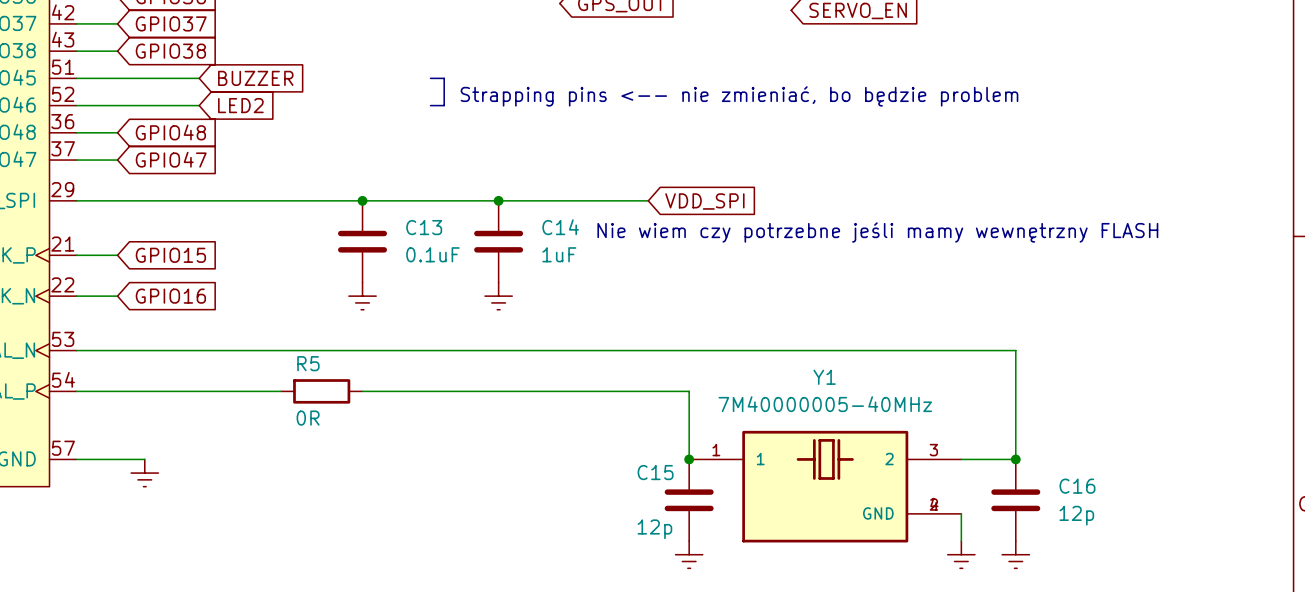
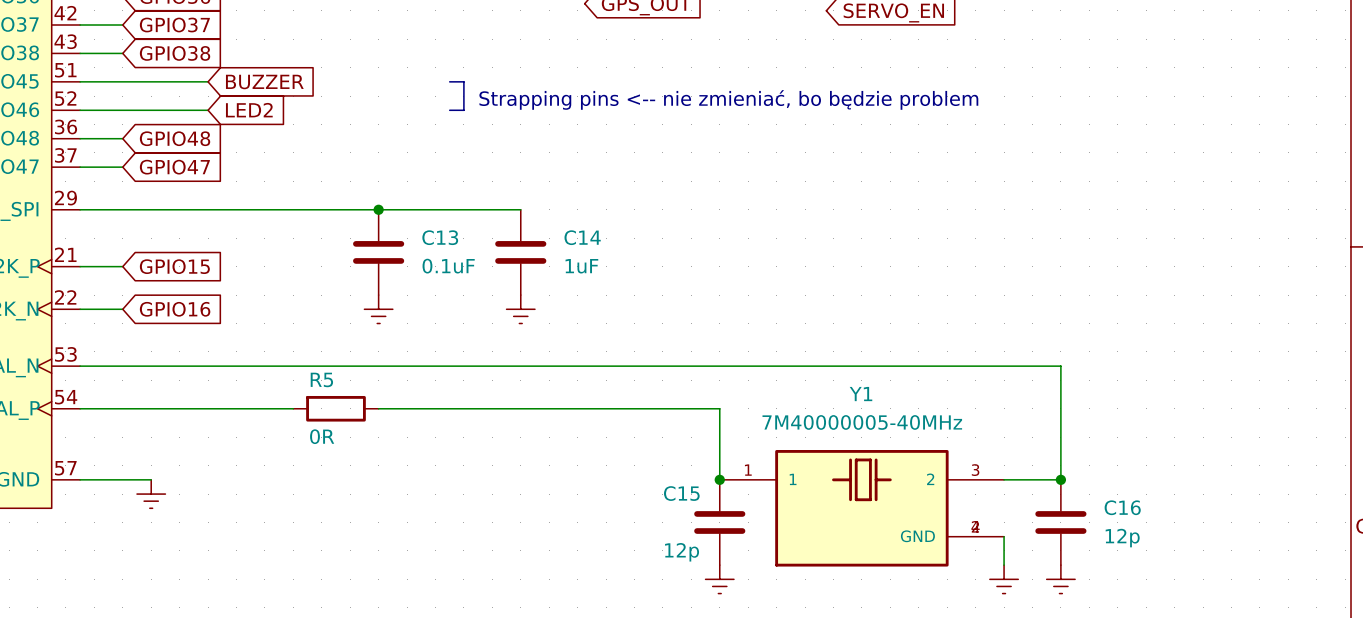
wire: (498, 200) (648, 200) -> none
junction: (498, 200) -> none
global label: VDD_SPI (704, 201) -> none
text: Nie wiem czy potrzebne jeśli mamy wewnętrzny FLASH (877, 232) -> none

